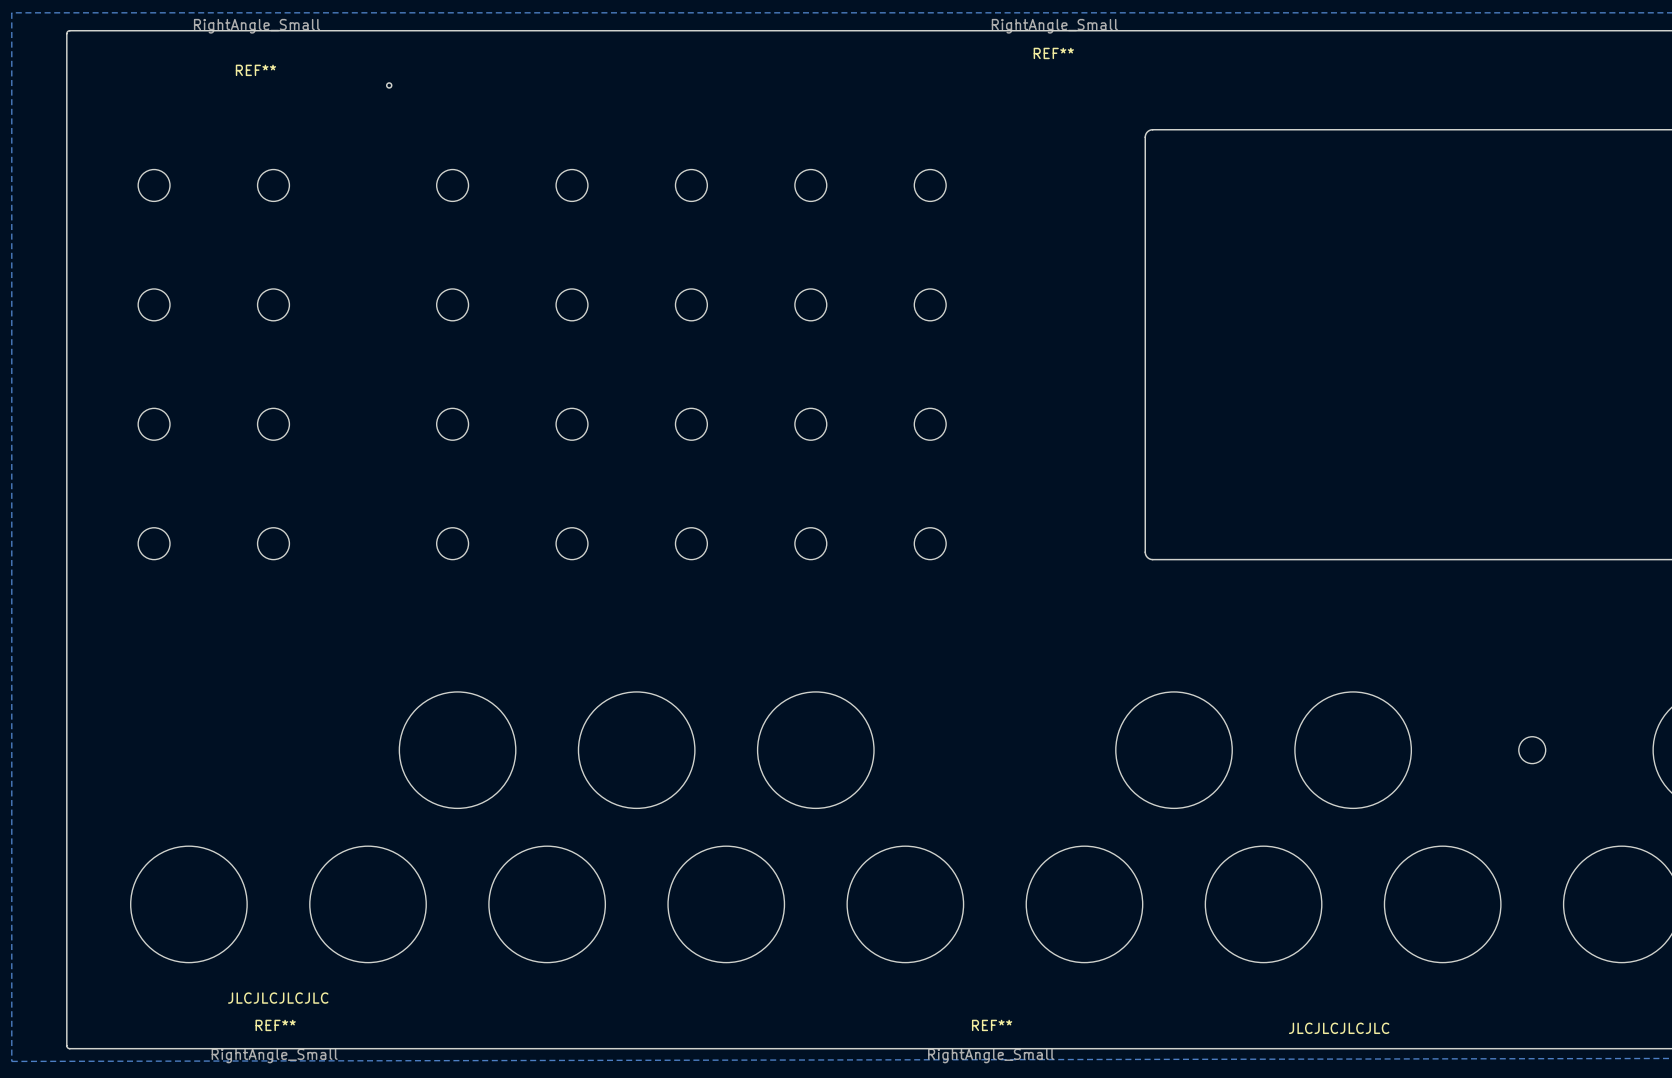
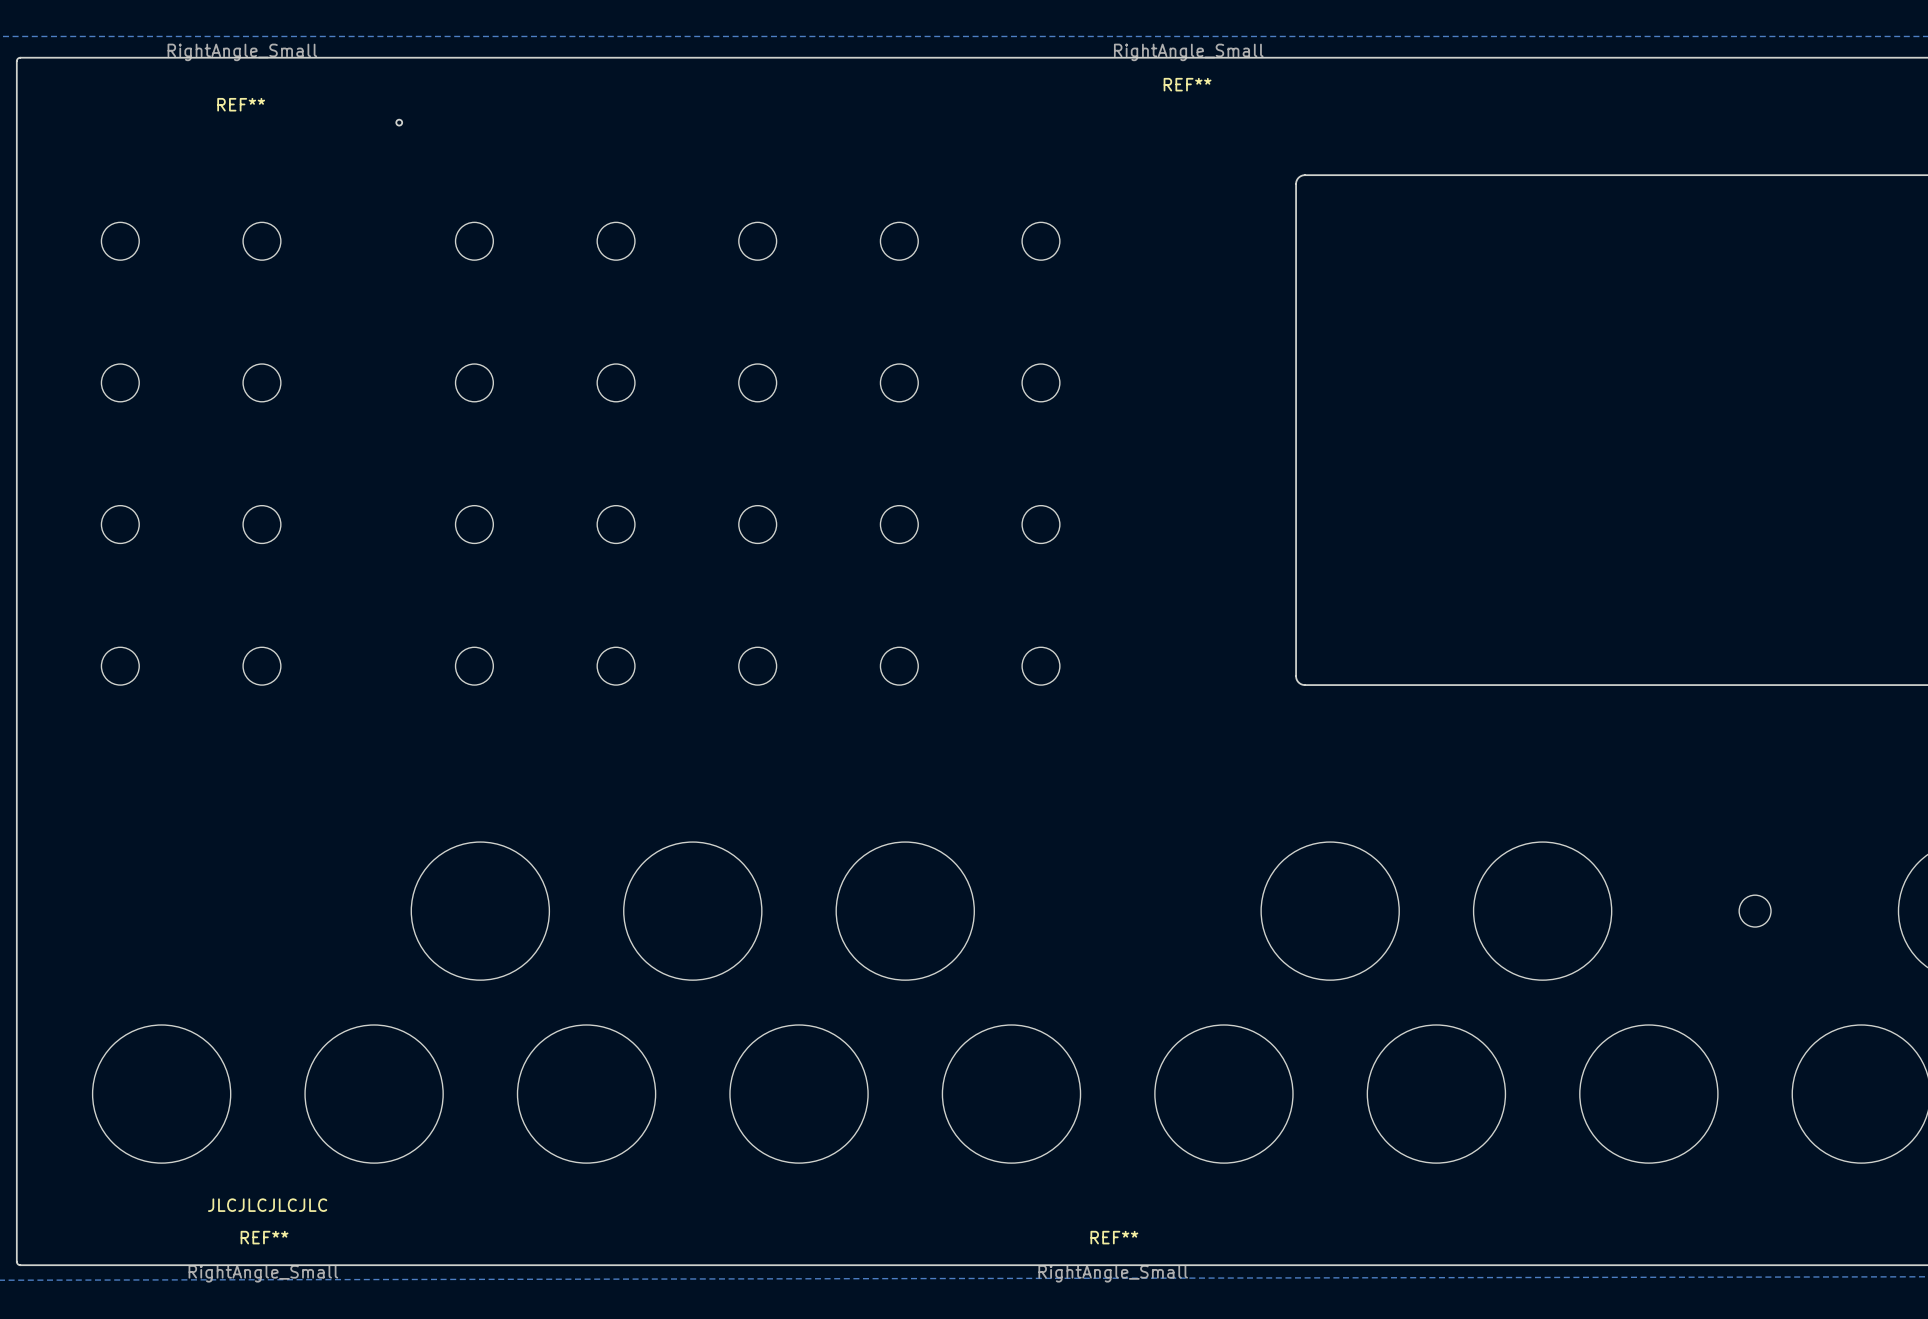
text: JLCJLCJLCJLC (1339, 1028) -> none

